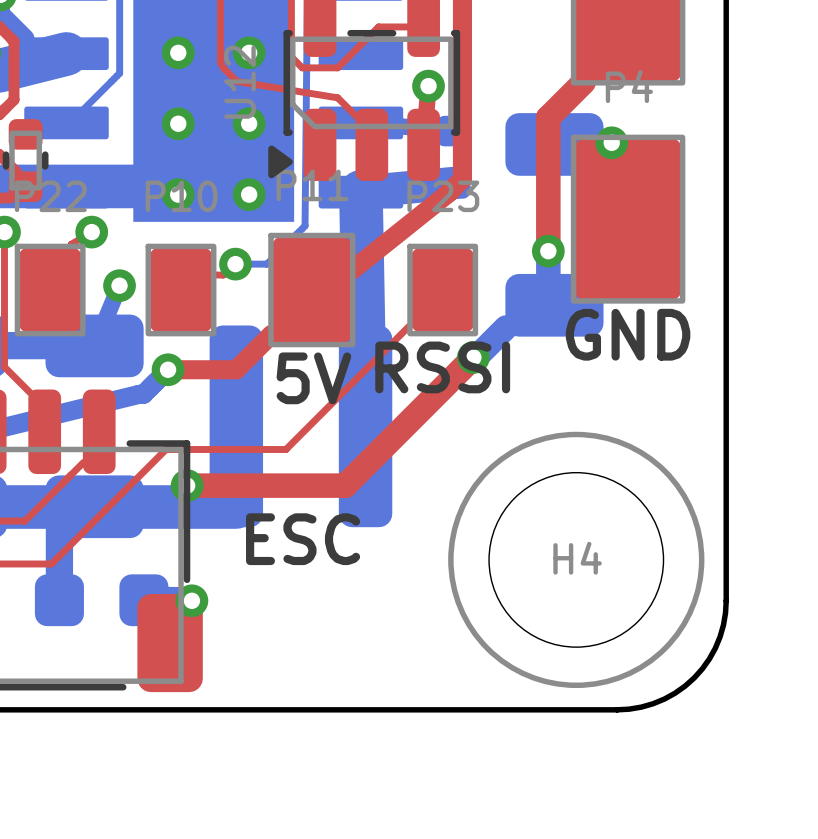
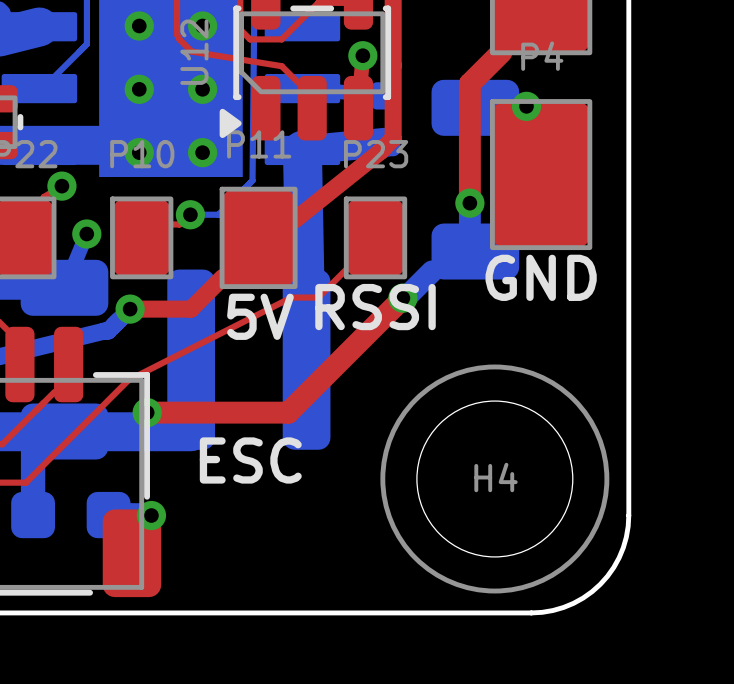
top track: (378, 356) (285, 449) (166, 449) -> (318, 297) (291, 297) (128, 380)

